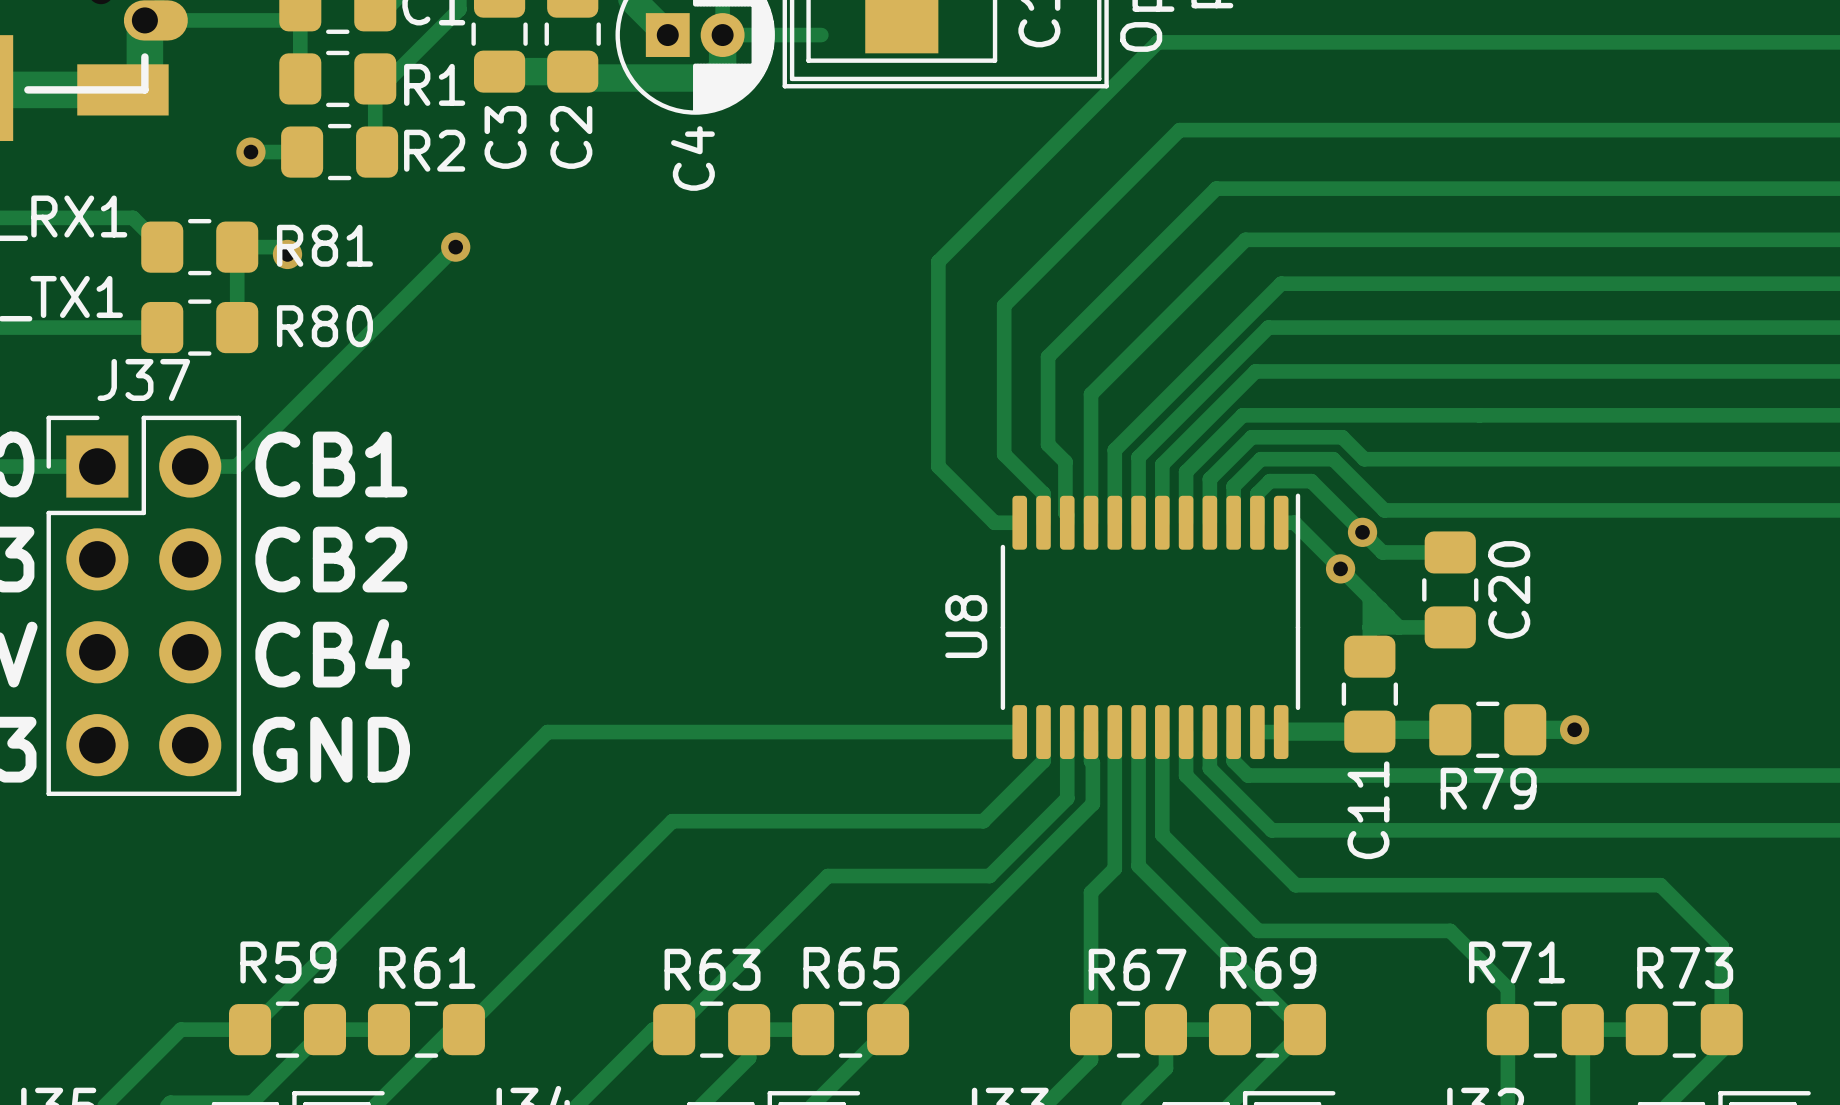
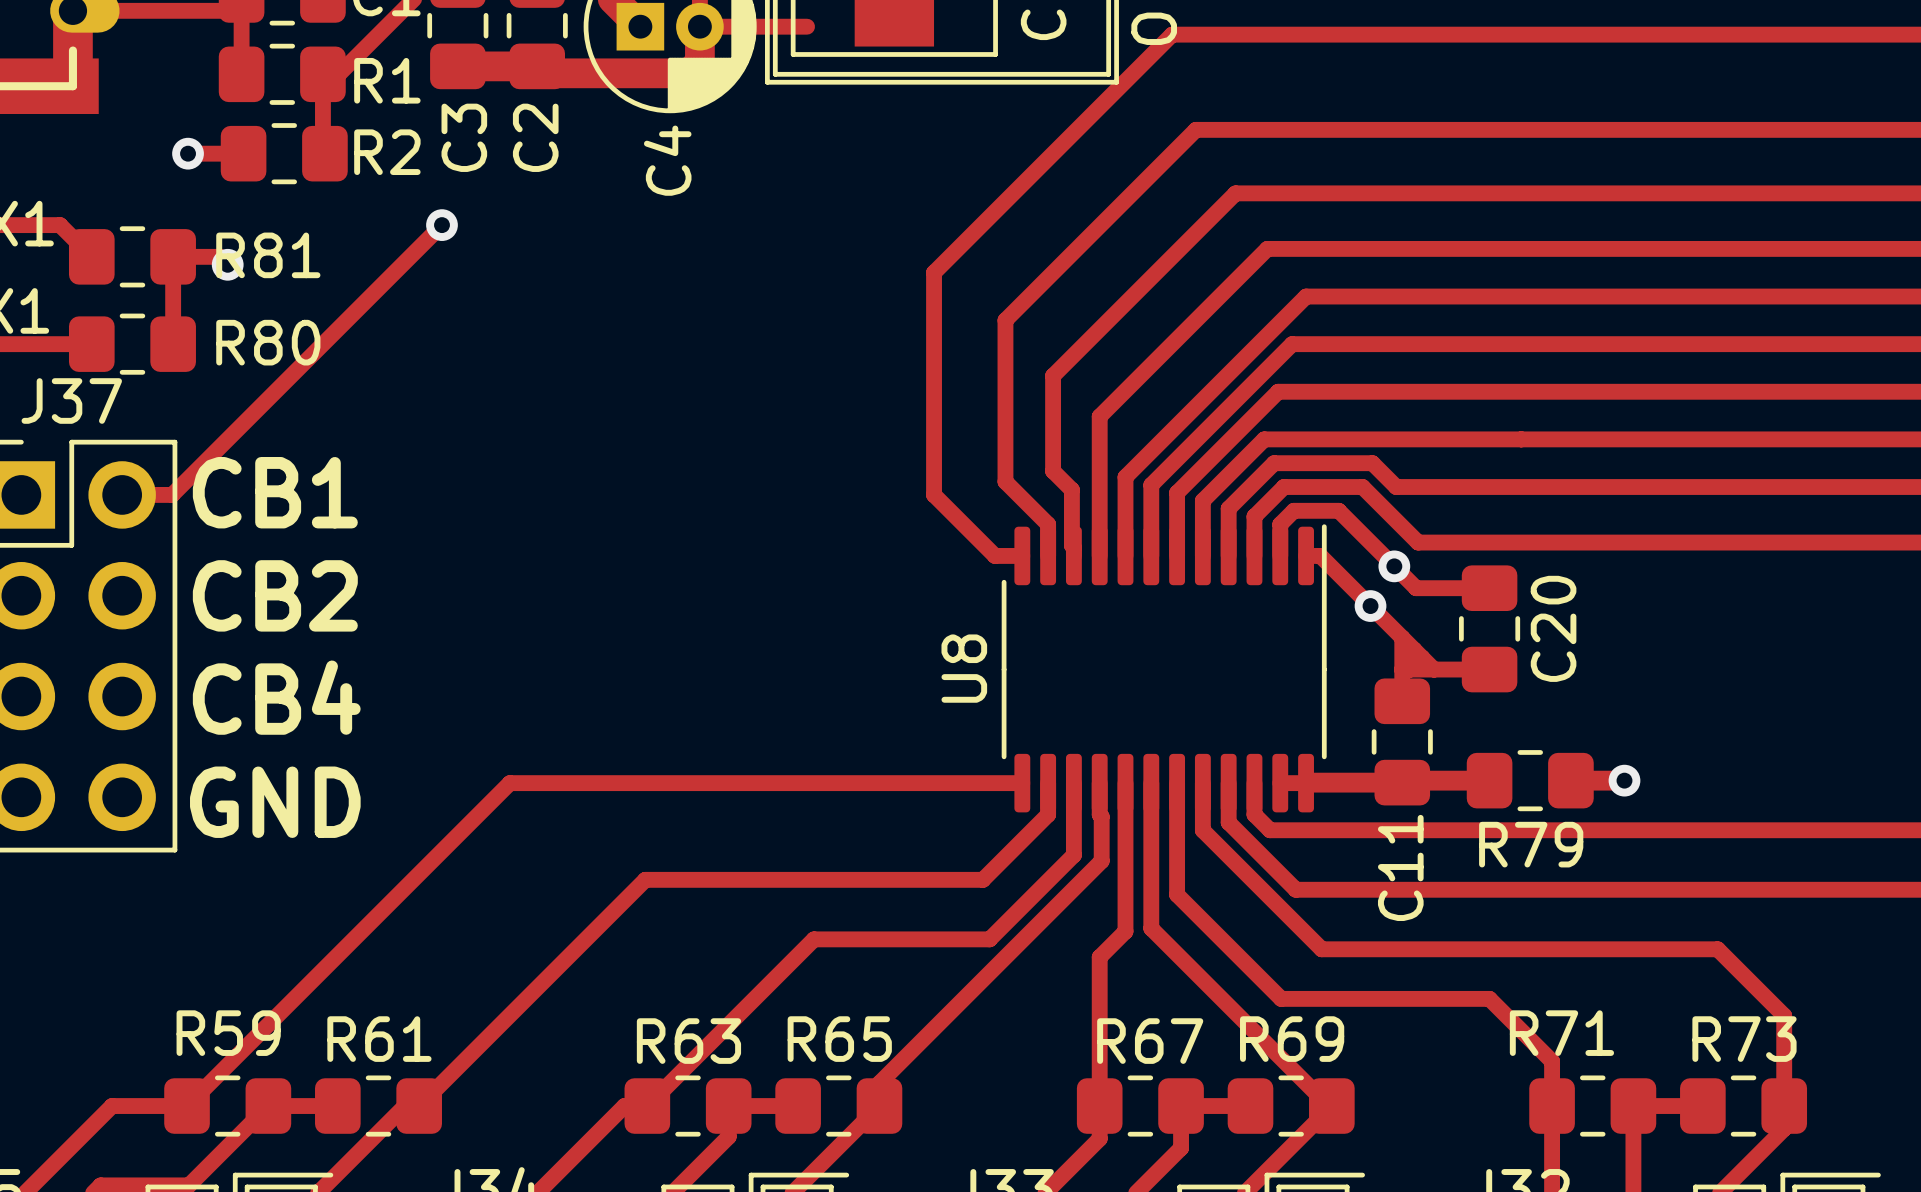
track: none -> (441, 225) (410, 256)
via position: (455, 247) -> (441, 225)

